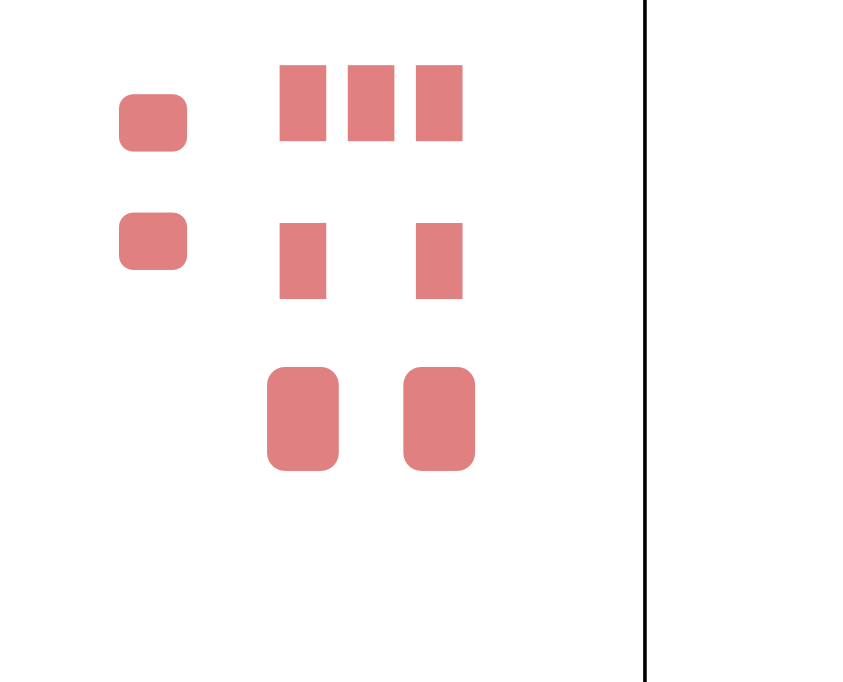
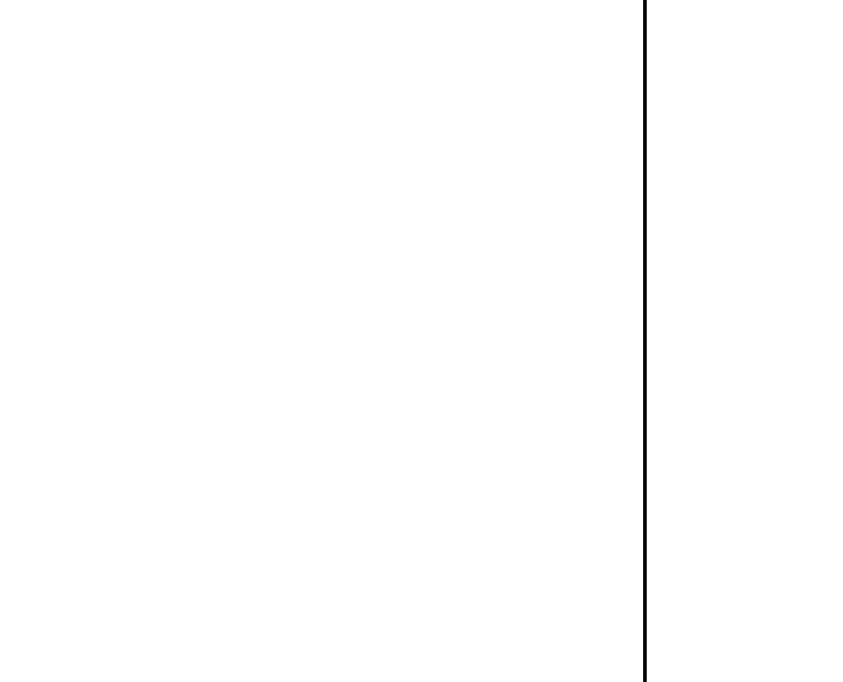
part: (153, 182) -> none
part: (371, 182) -> none
part: (371, 418) -> none

